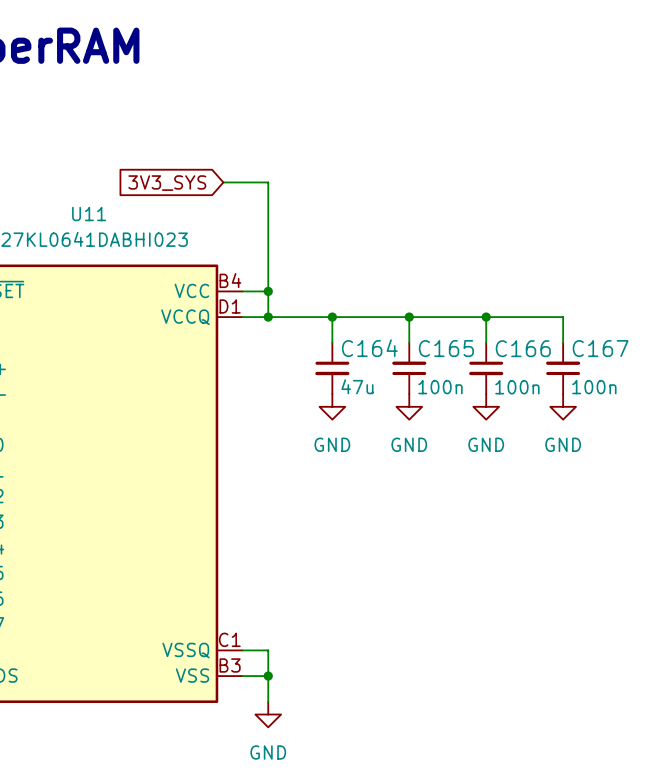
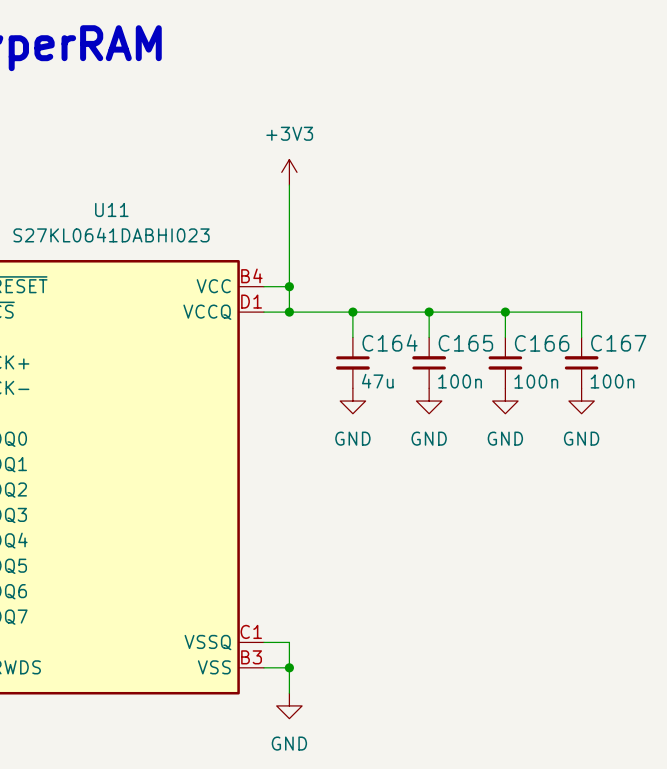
power symbol: none -> +3V3 (289, 172)
wire: (223, 182) (268, 182) (268, 188) -> none
global label: 3V3_SYS (167, 183) -> none

